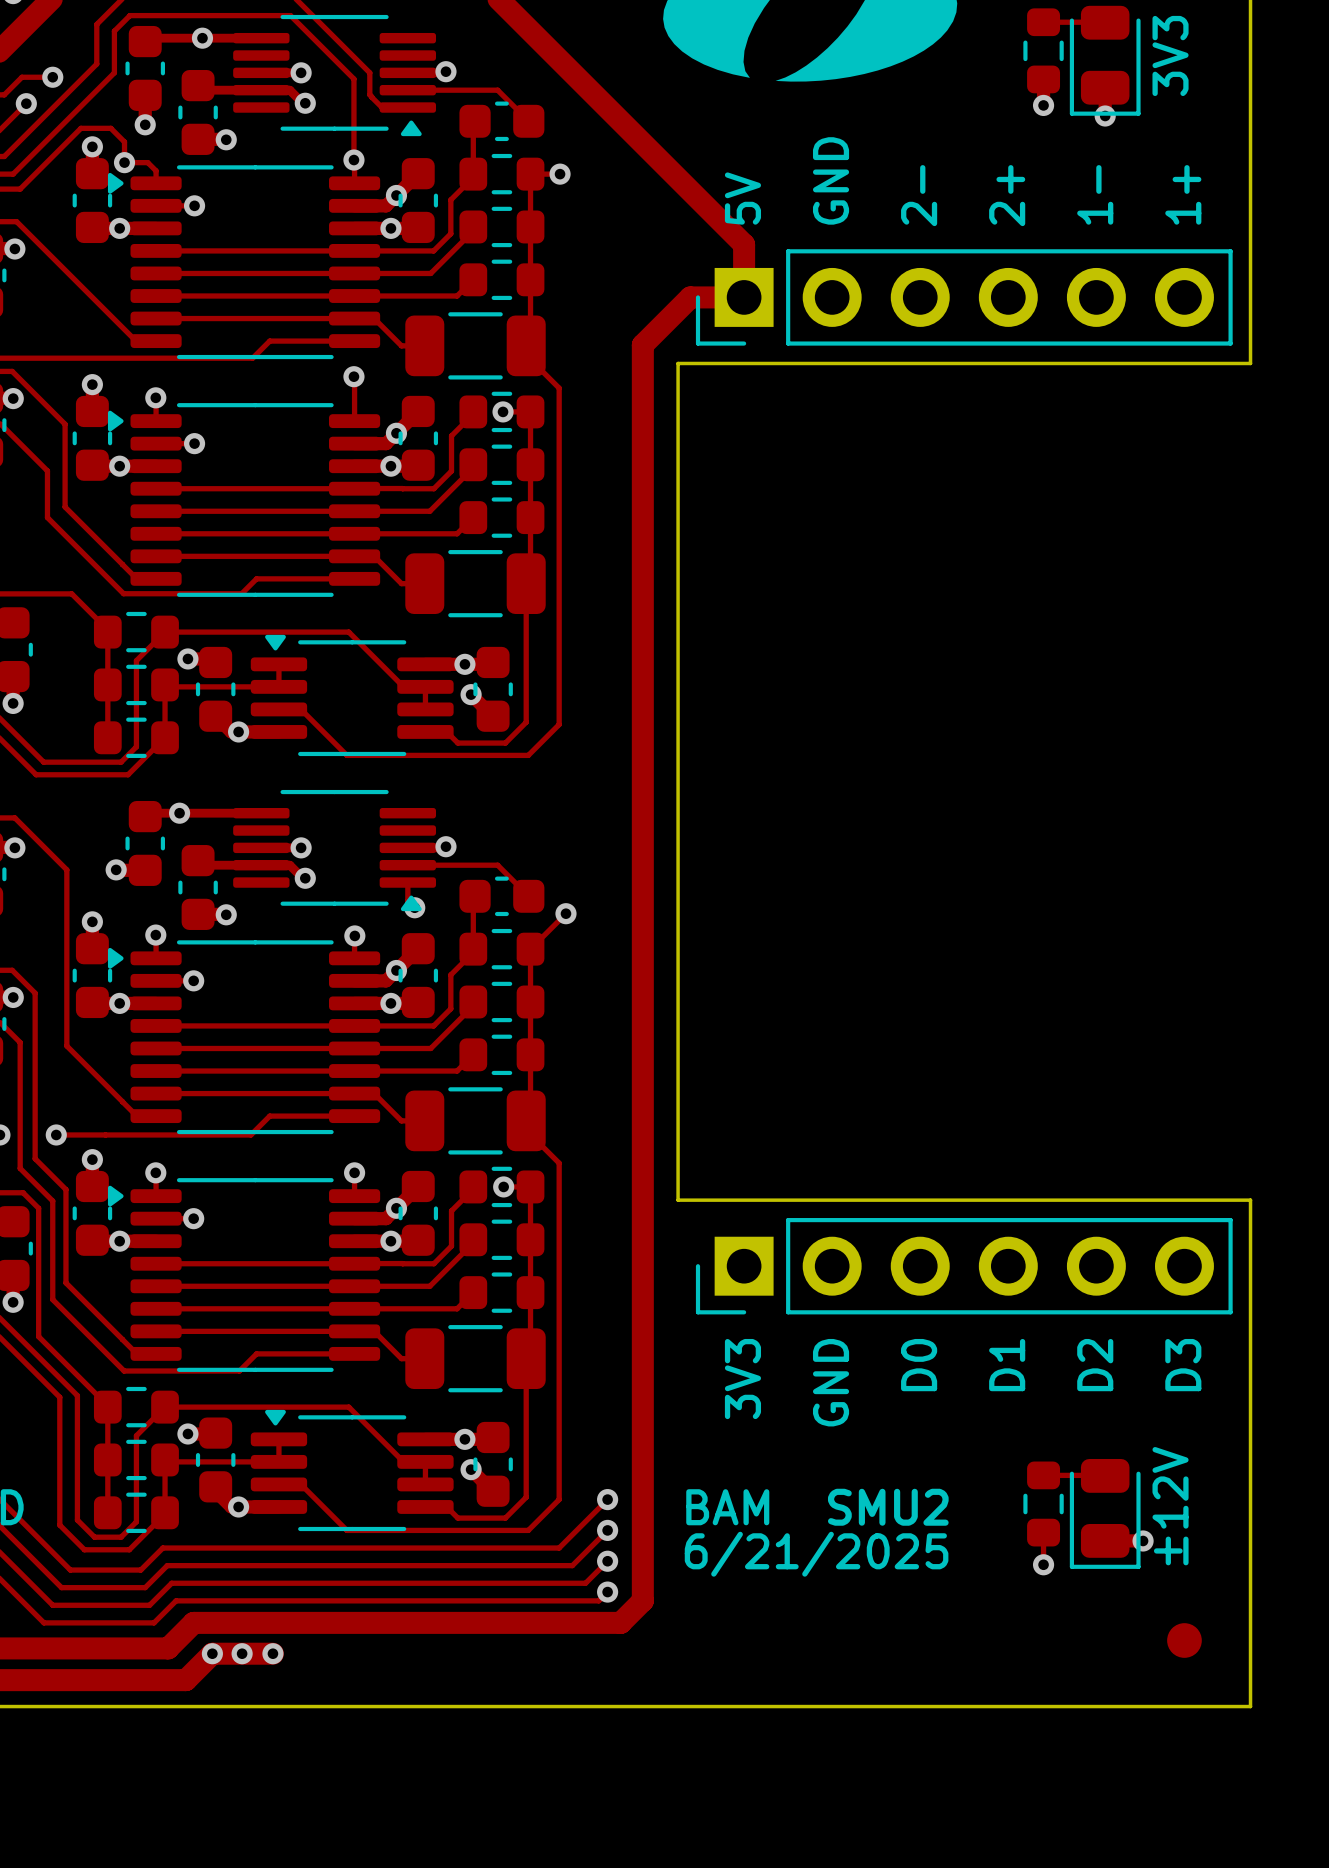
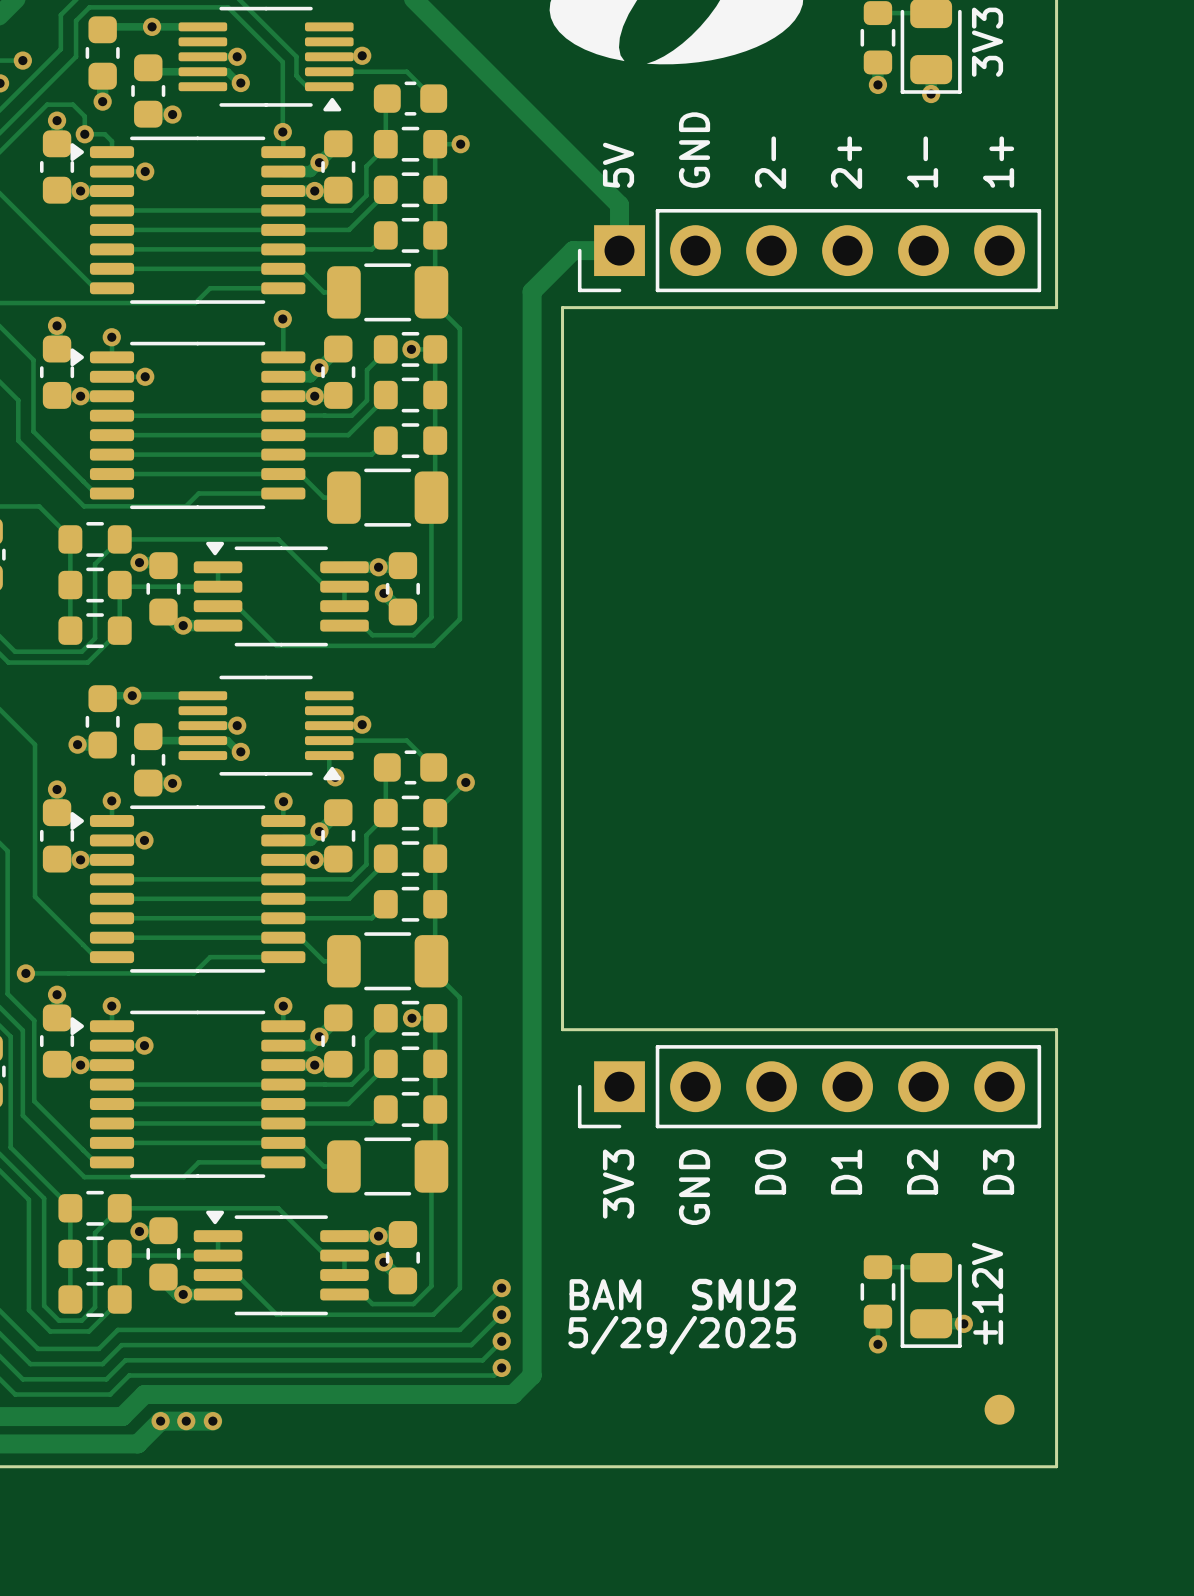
text: 6/21/2025 (816, 1554) -> 5/29/2025 (682, 1335)

